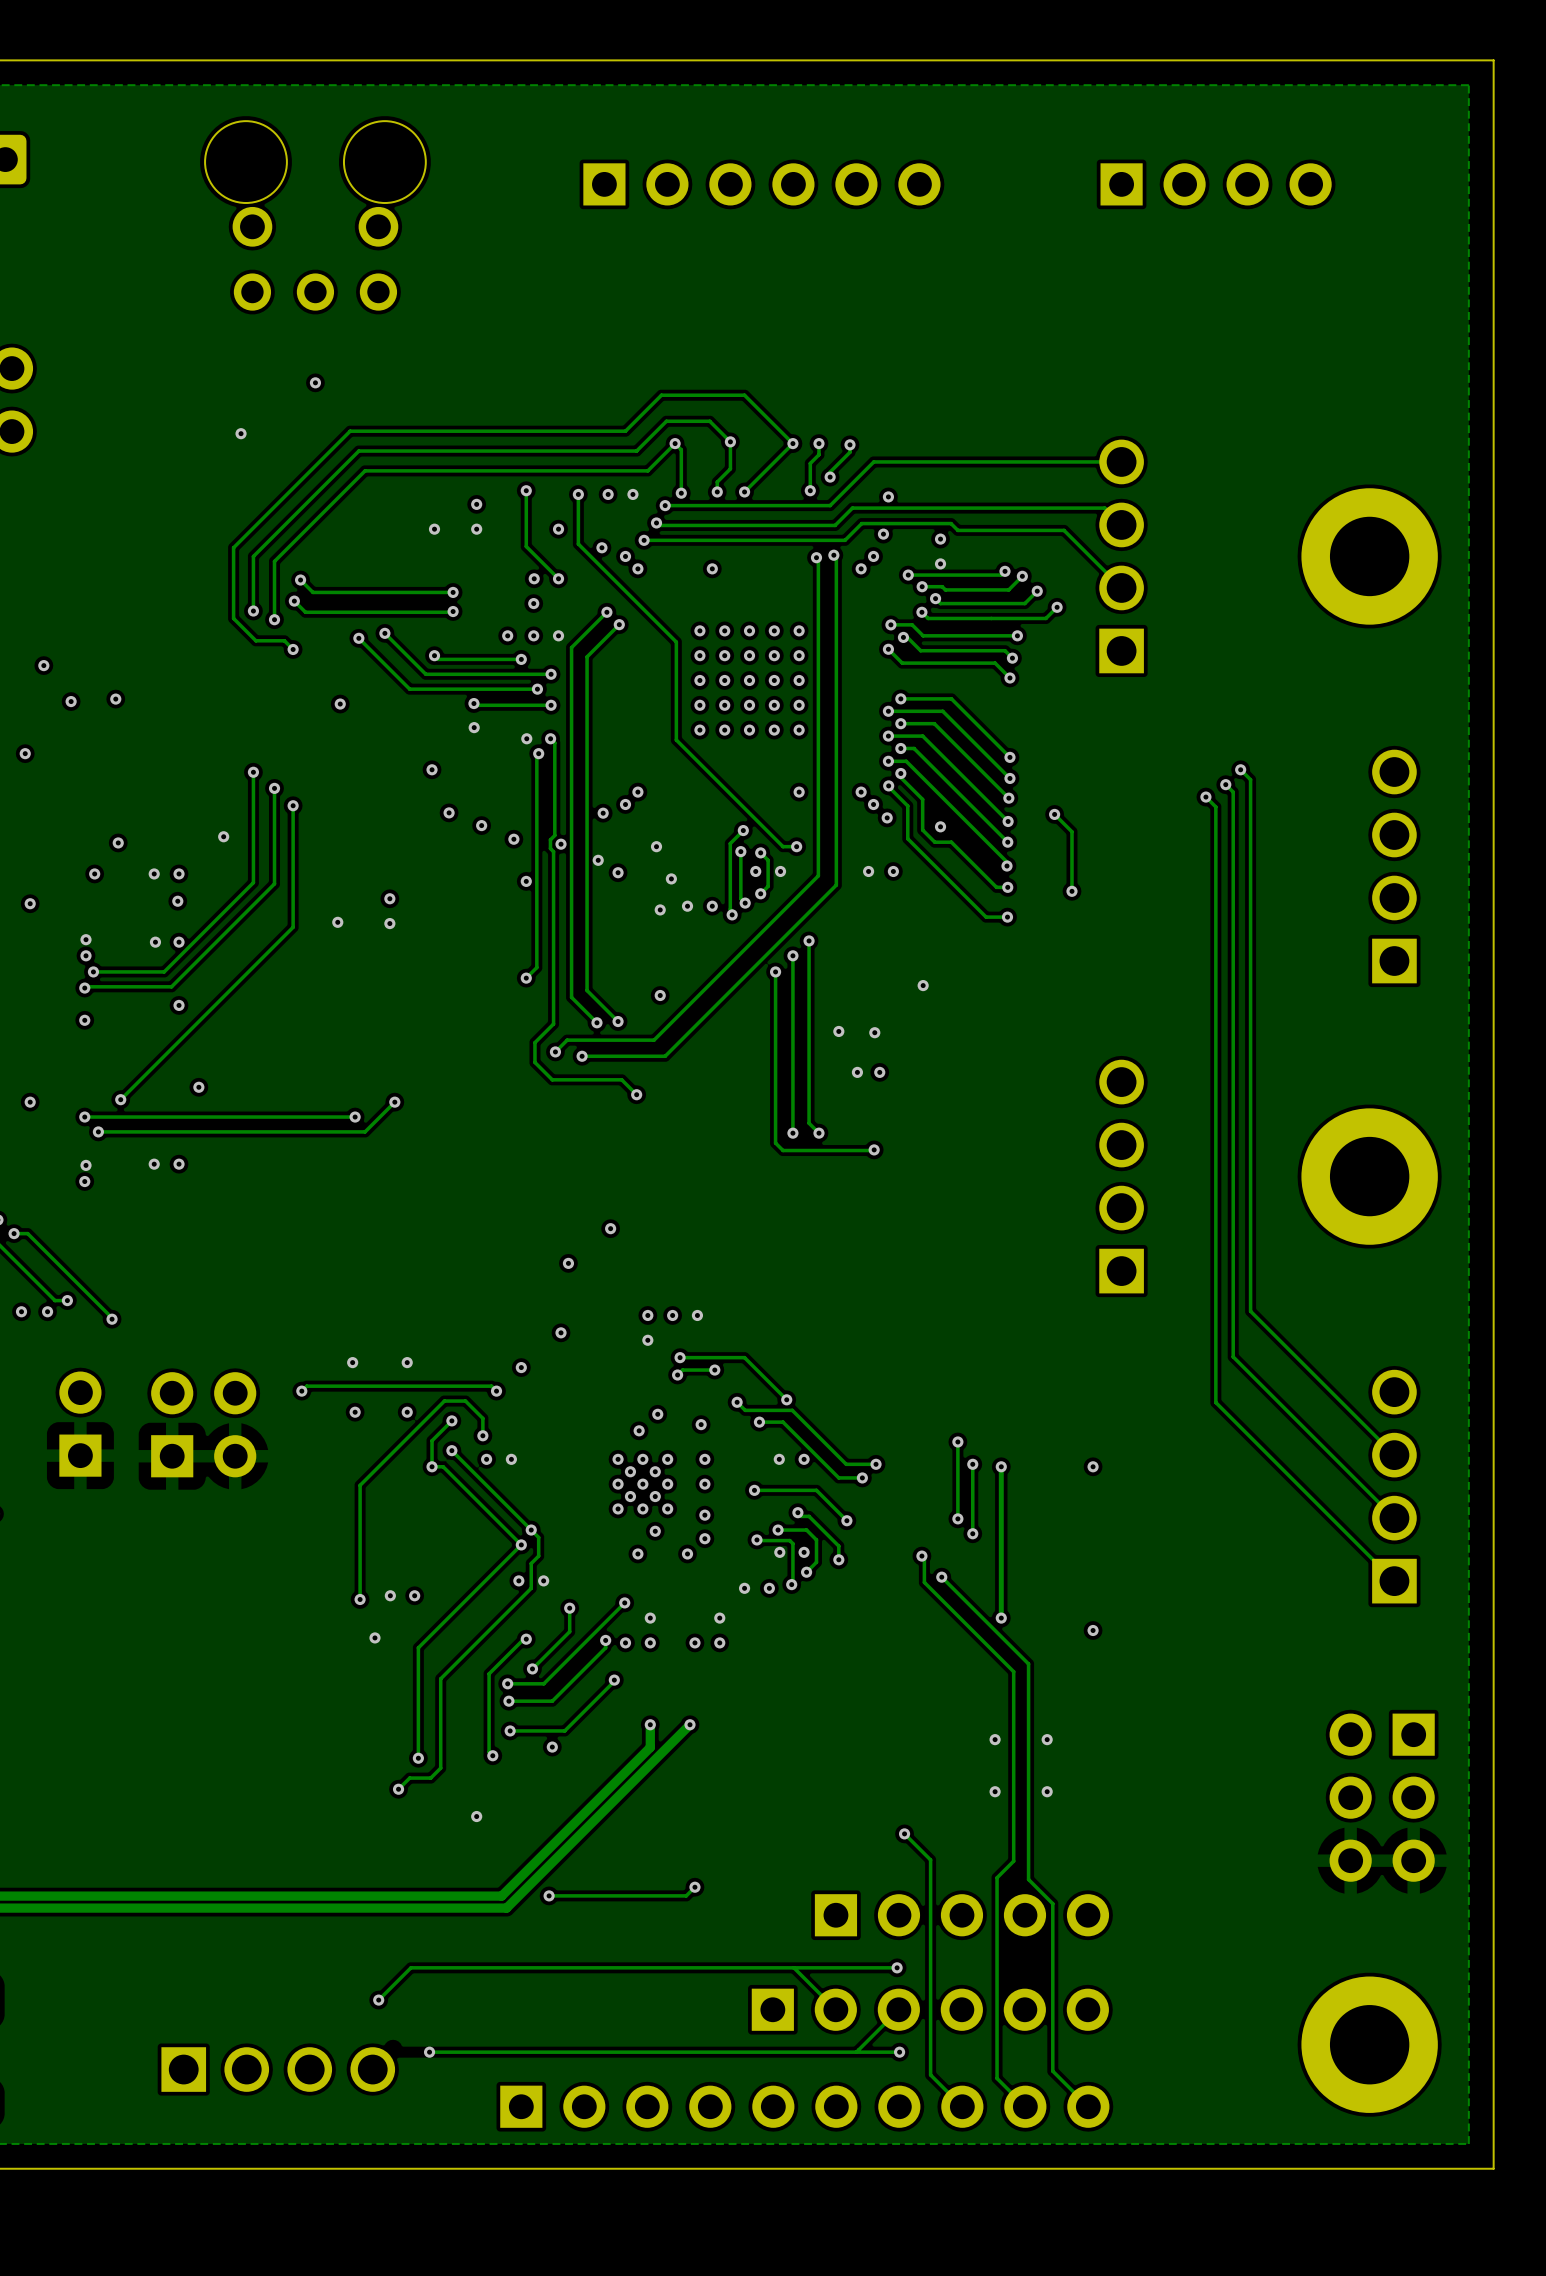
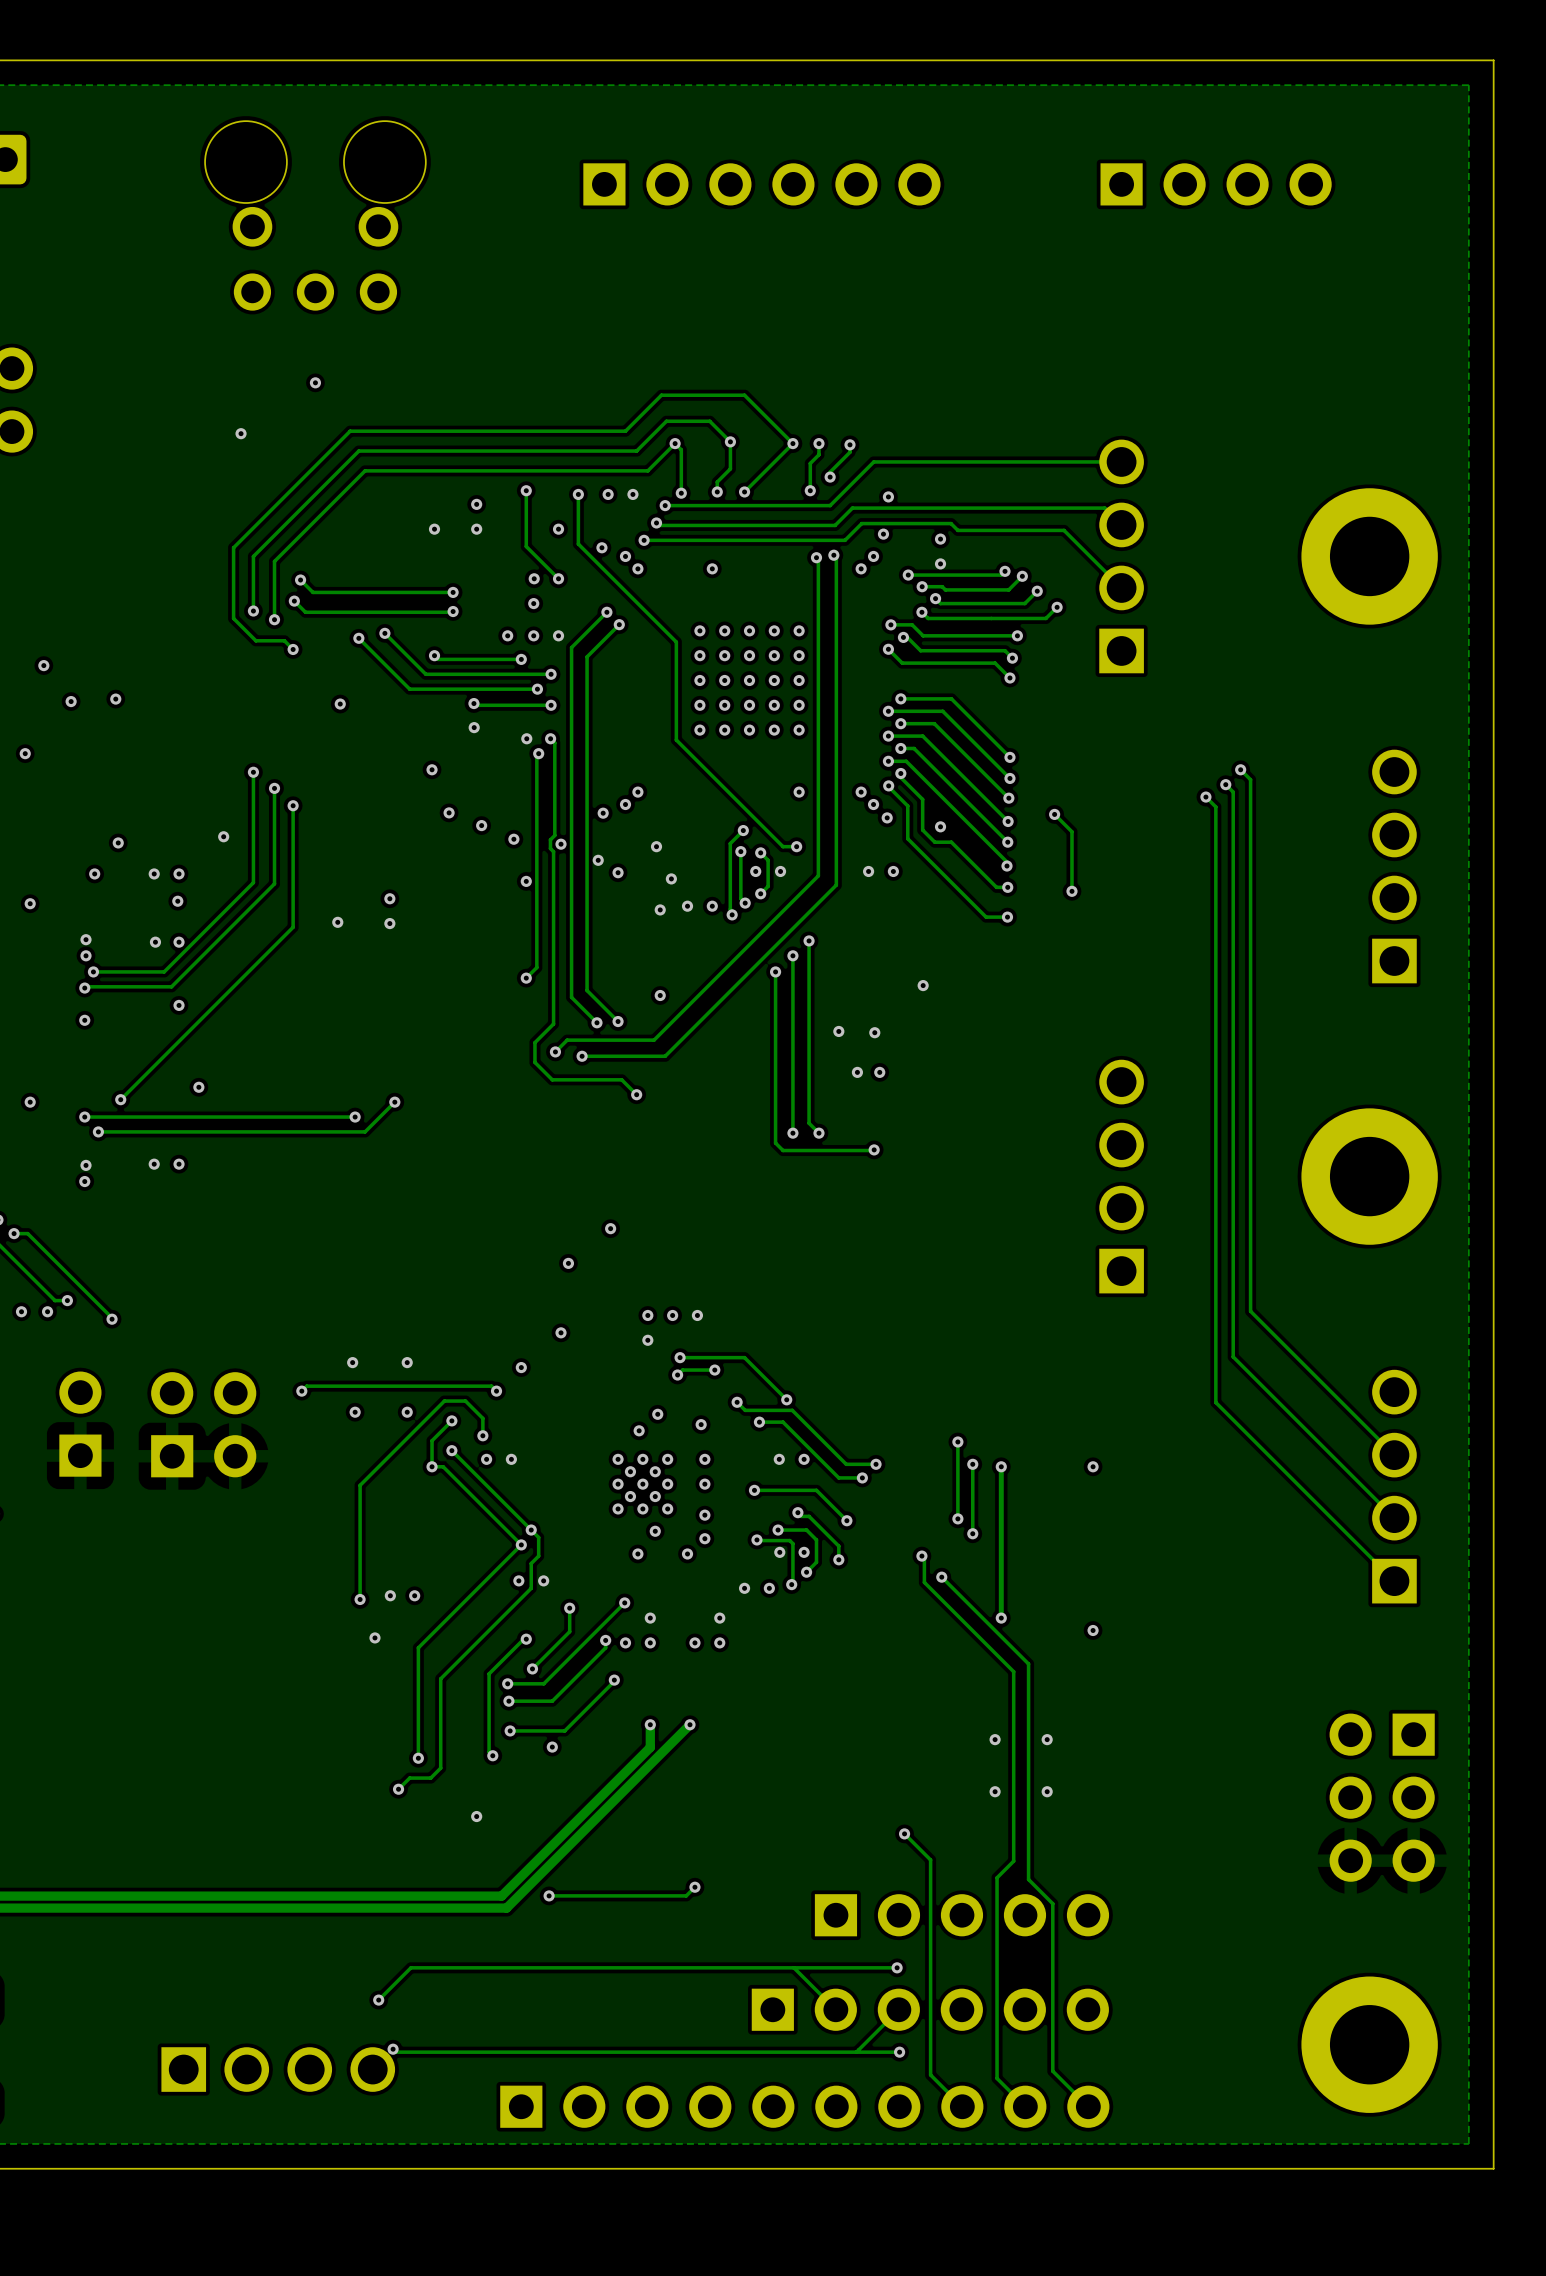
track: none -> (393, 2049) (396, 2052) (429, 2052)
via position: (429, 2052) -> (393, 2049)

